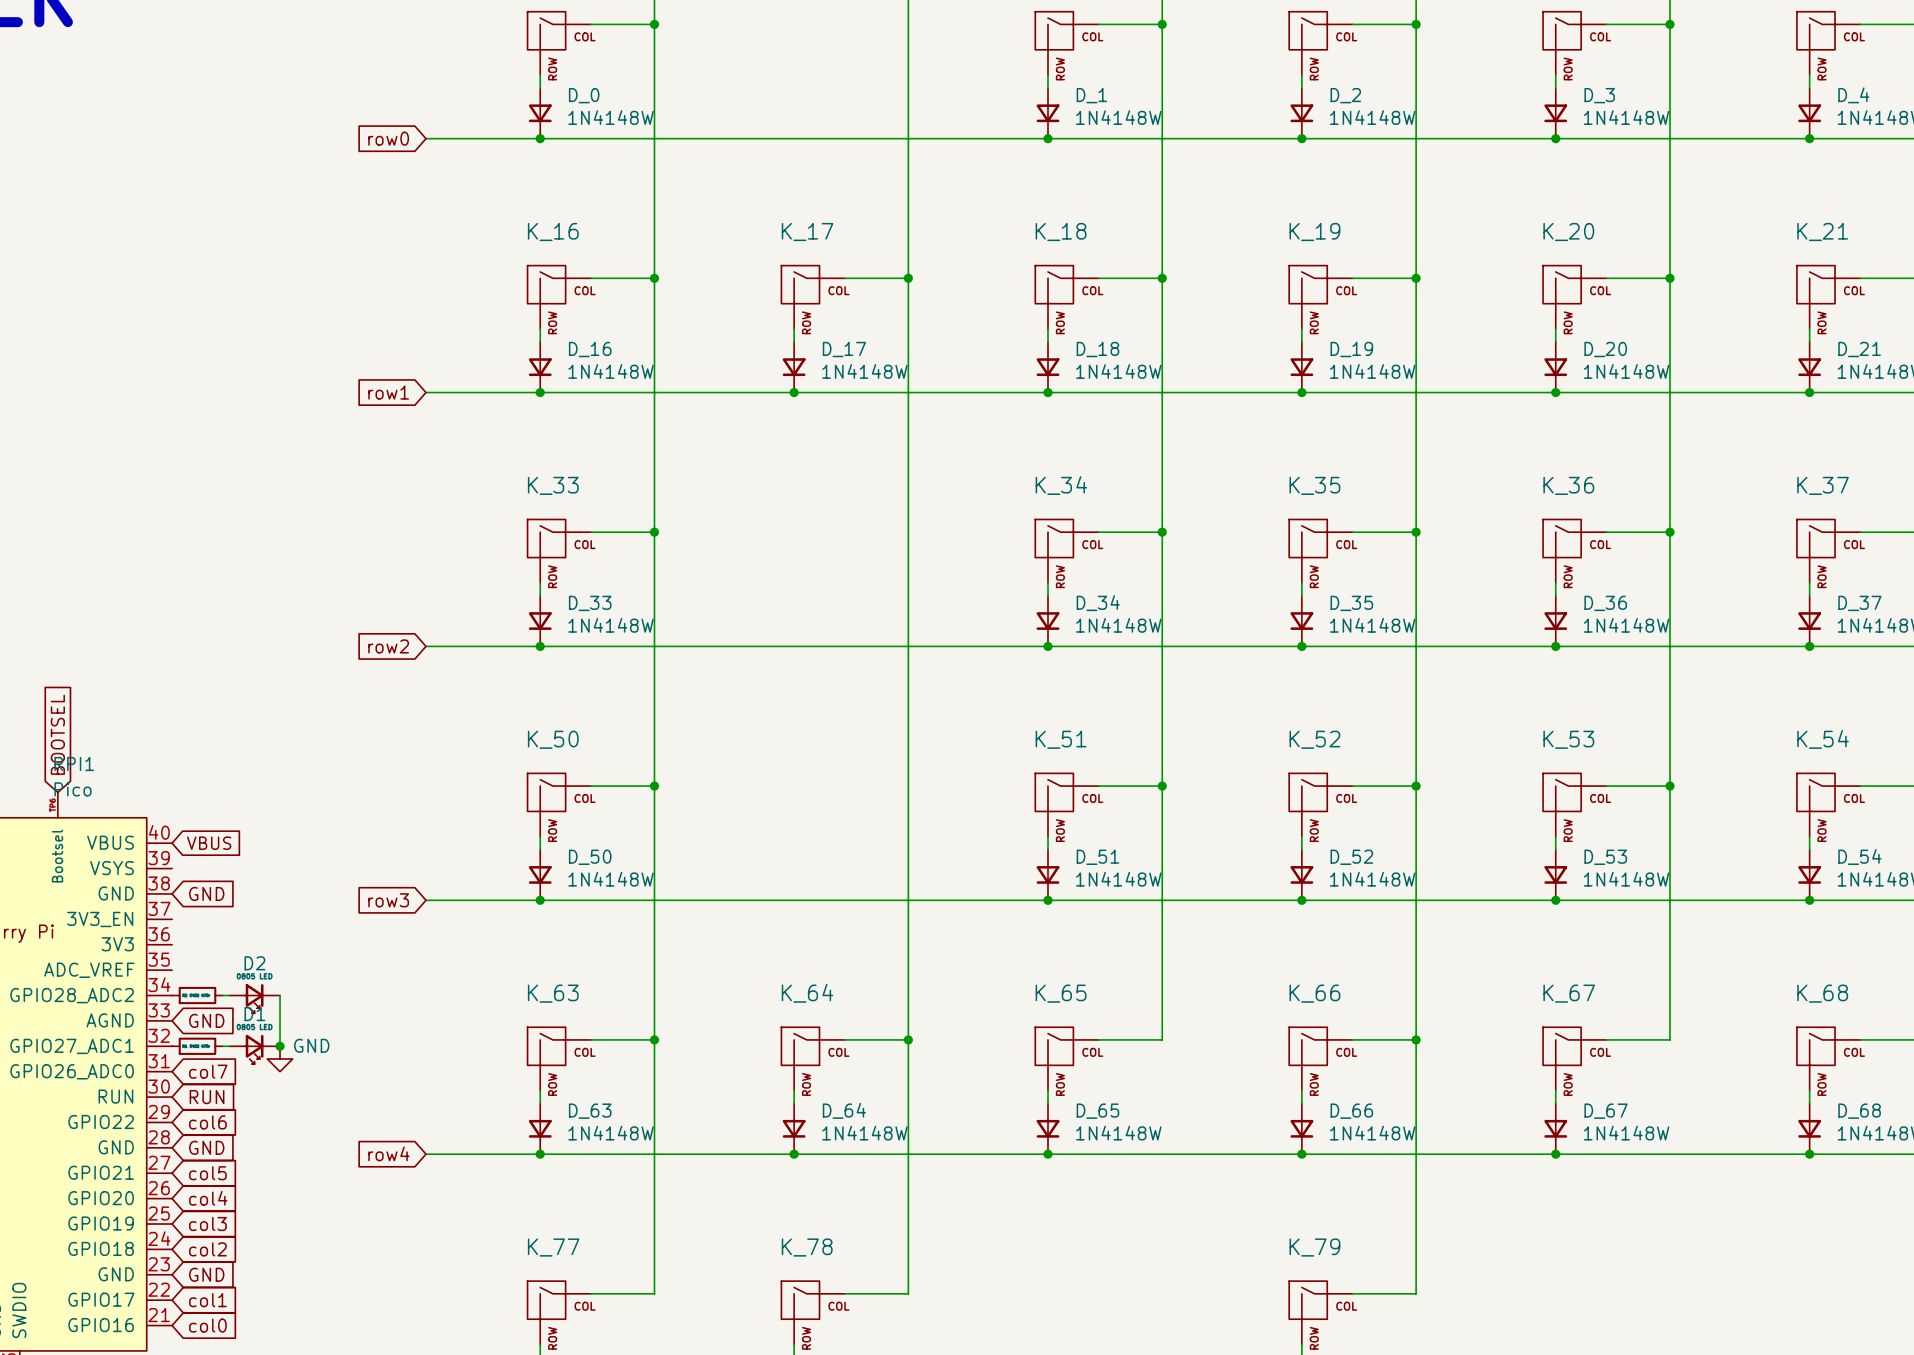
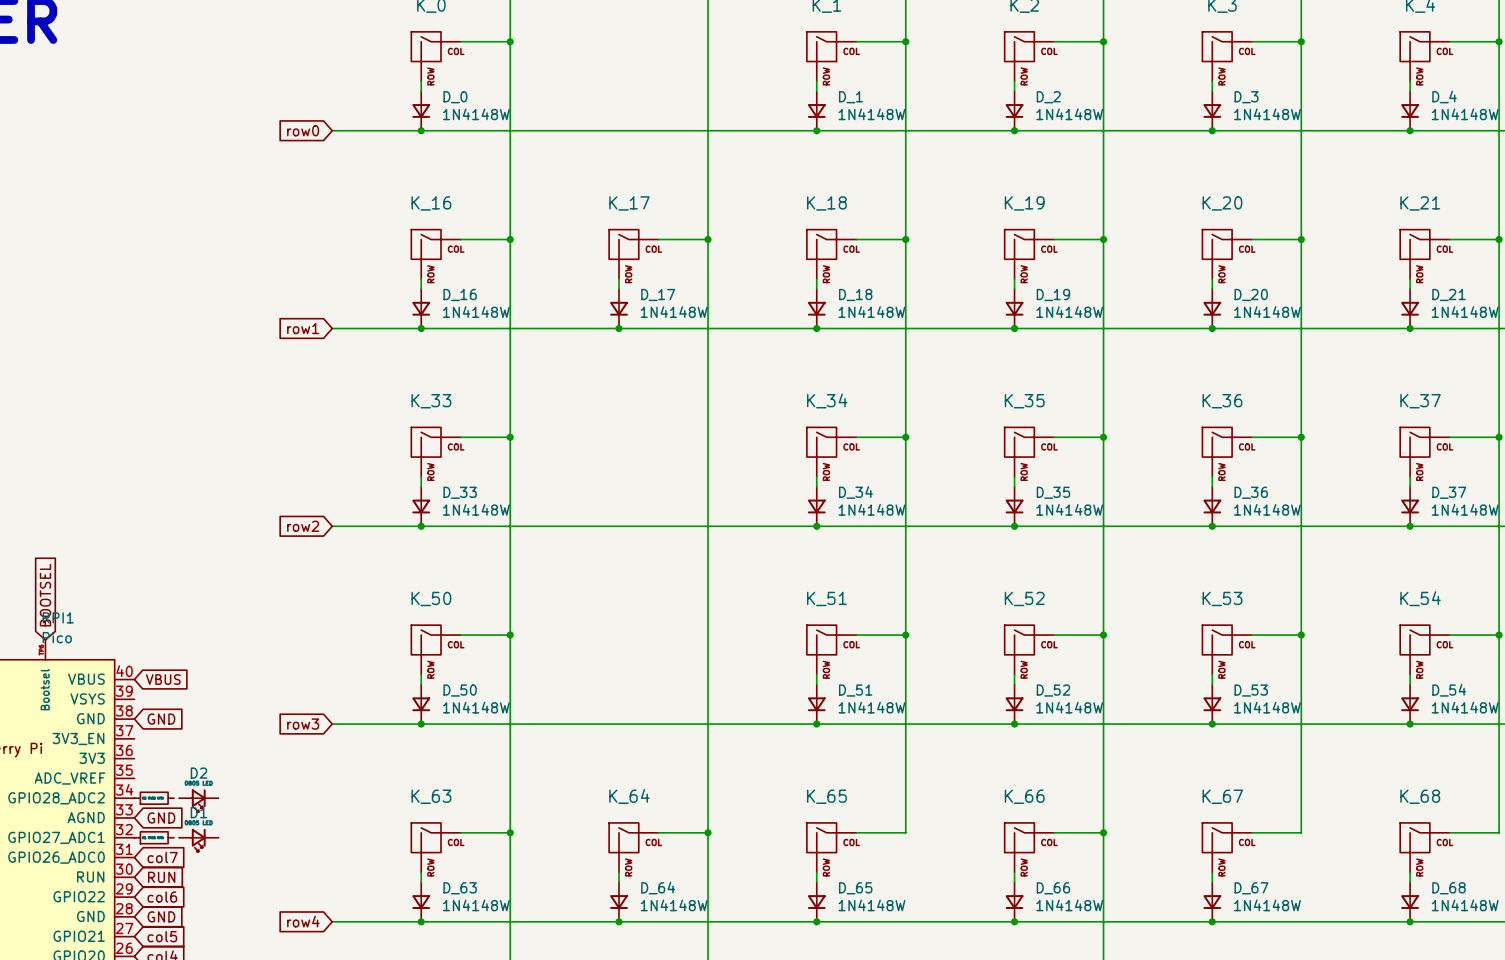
wire: (222, 995) (229, 995) -> none
wire: (280, 995) (280, 1046) -> none
wire: (222, 1046) (229, 1046) -> none
junction: (280, 1046) -> none
power symbol: GND (280, 1058) -> none

